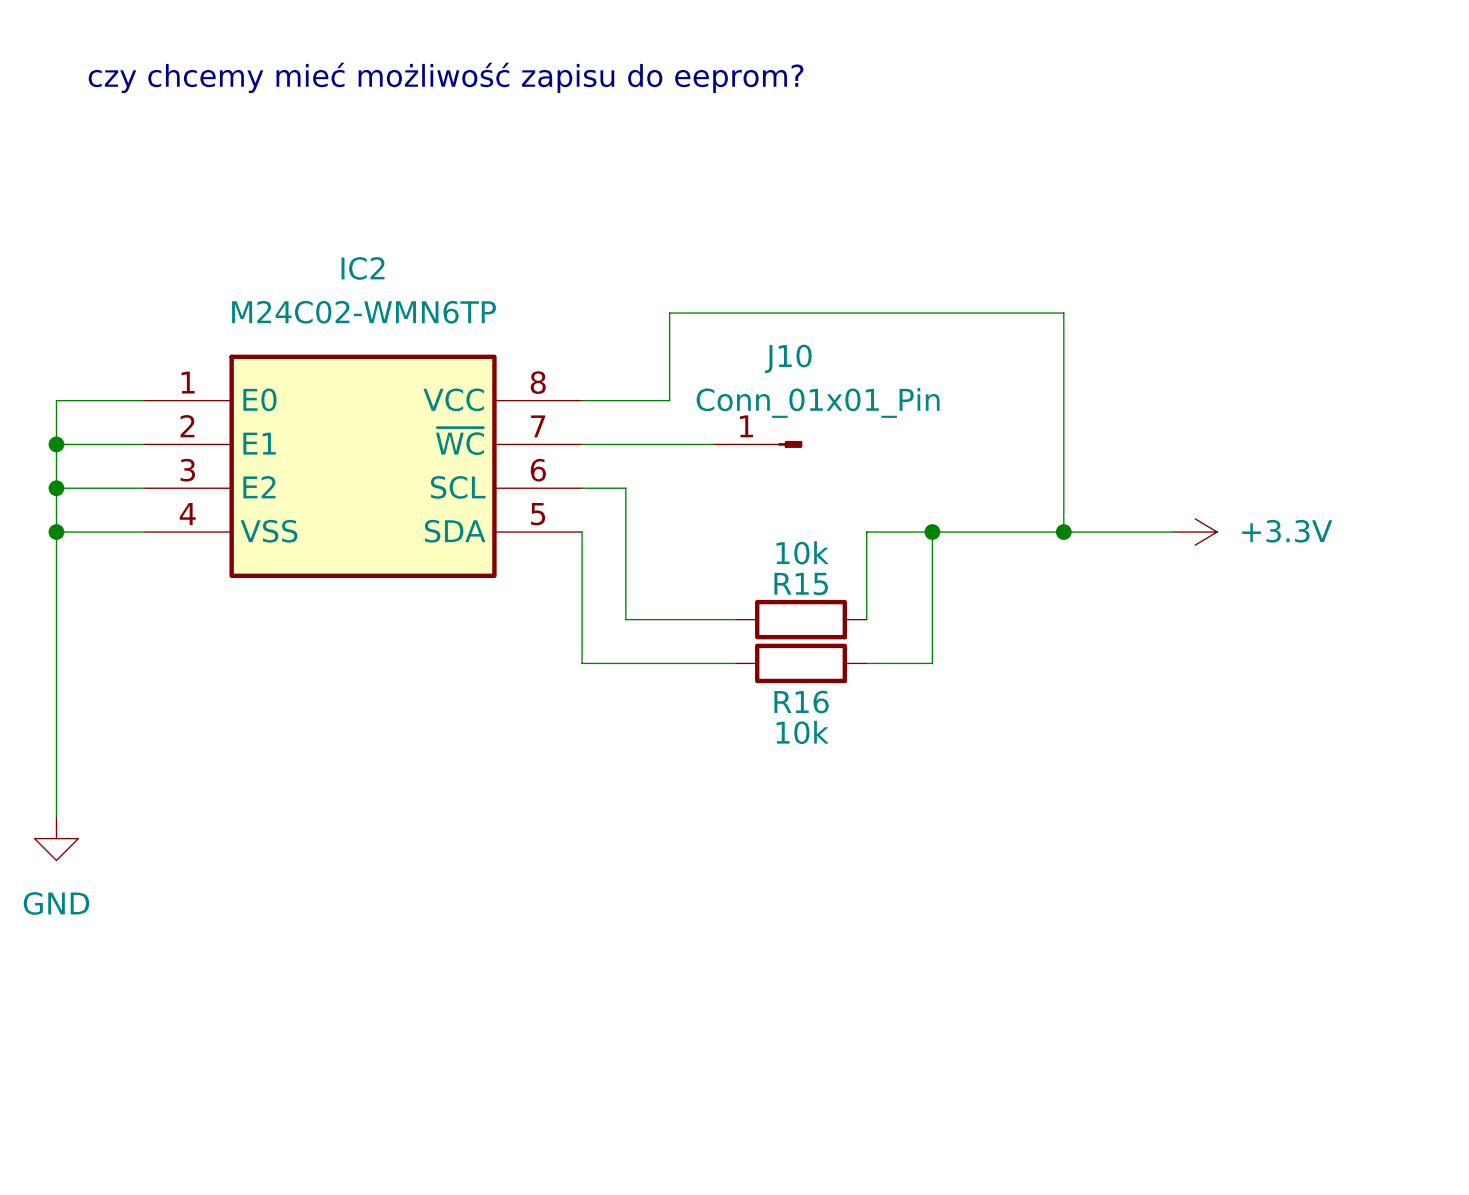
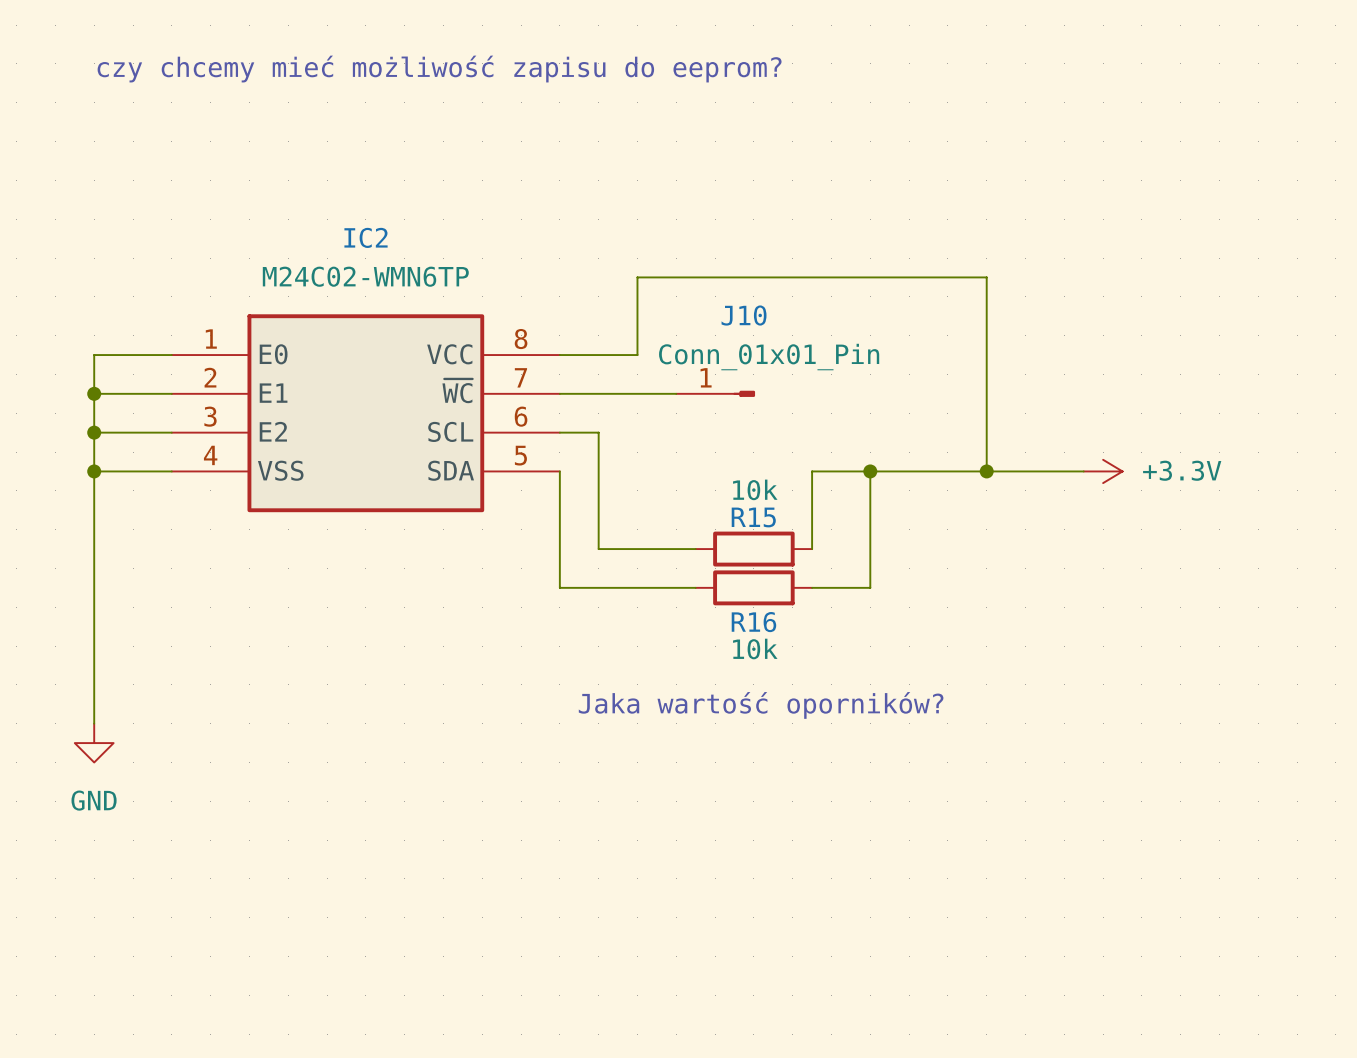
text: none -> Jaka wartość oporników? (761, 705)

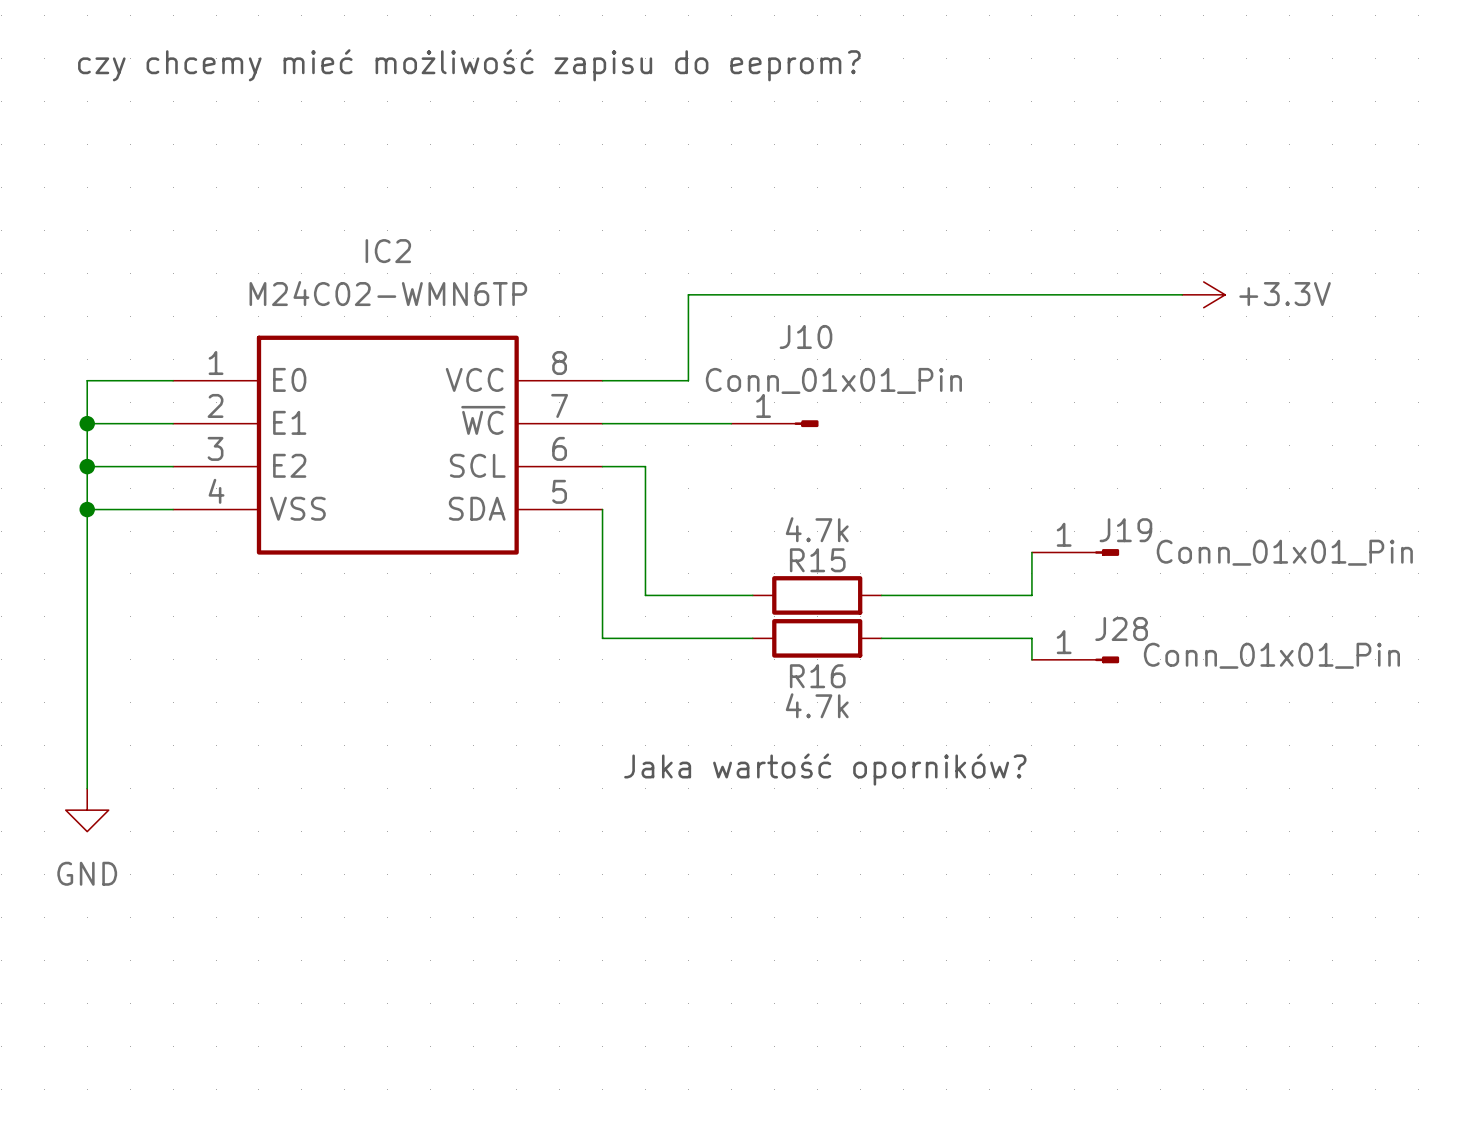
wire: (986, 277) (986, 471) -> (1074, 294) (1182, 294)
power symbol text position: +3.3V (1182, 470) -> +3.3V (1285, 294)
wire: (870, 471) (870, 587) -> (1031, 659) (1031, 638) (946, 638)
junction: (870, 471) -> none
junction: (986, 471) -> none
wire: (1083, 471) (812, 471) (812, 549) -> (1031, 552) (1031, 595) (881, 595)
power symbol position: +3.3V (1103, 471) -> +3.3V (1203, 294)
R15 value: 10k (755, 489) -> 4.7k (817, 529)
J19: none -> Conn_01x01_Pin (1075, 552)
J28: none -> Conn_01x01_Pin (1075, 659)
R16 value: 10k (755, 649) -> 4.7k (817, 705)

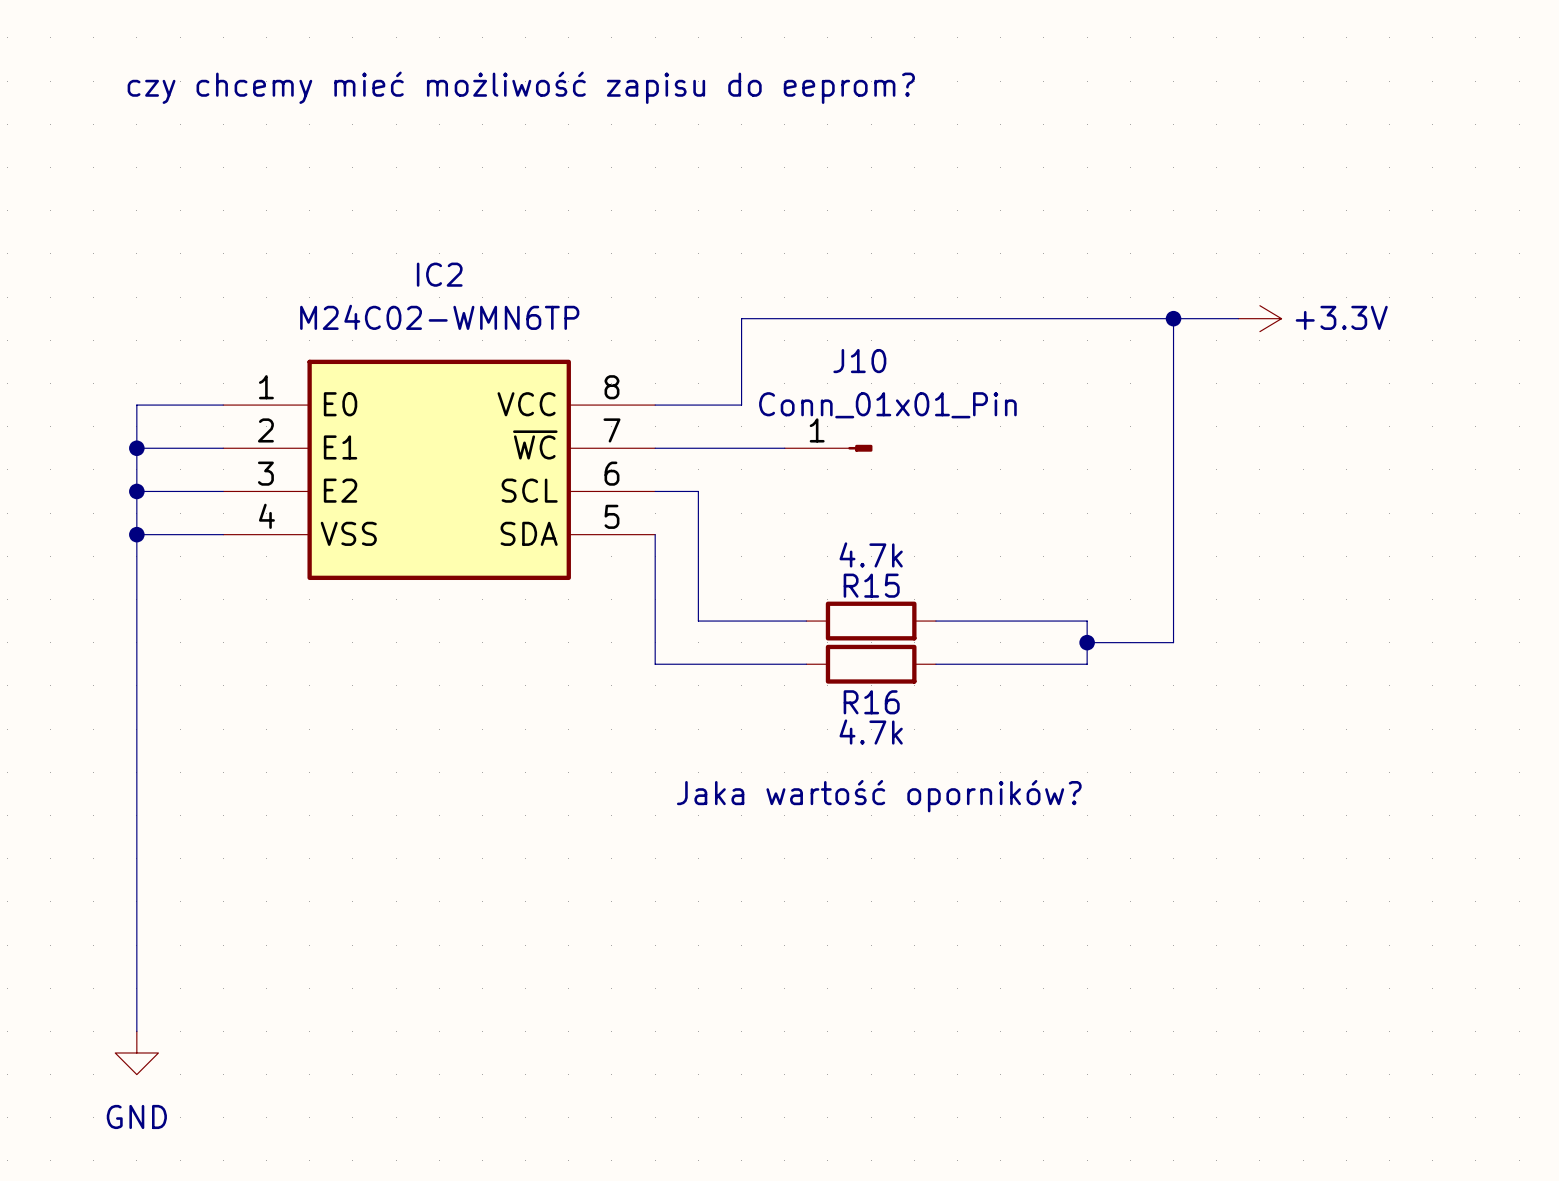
wire: none -> (1173, 318) (1173, 642) (1087, 642)
junction: none -> (1173, 318)
wire: (1031, 552) (1031, 595) -> none
J19: Conn_01x01_Pin (1075, 552) -> none
junction: none -> (1087, 642)
wire: (1031, 638) (1031, 659) -> (1087, 664) (1087, 621)
J28: Conn_01x01_Pin (1075, 659) -> none
wire: none -> (136, 815) (136, 1031)
power symbol position: GND (87, 810) -> GND (136, 1052)

